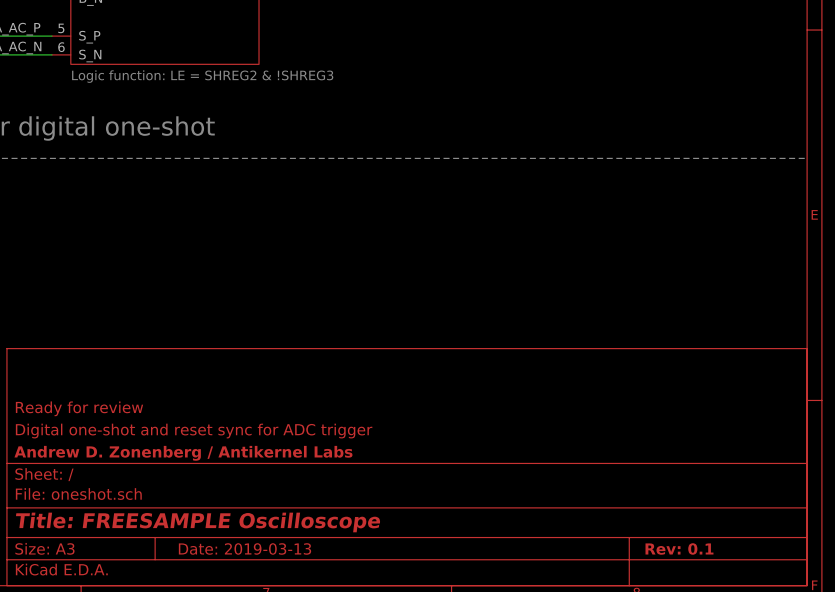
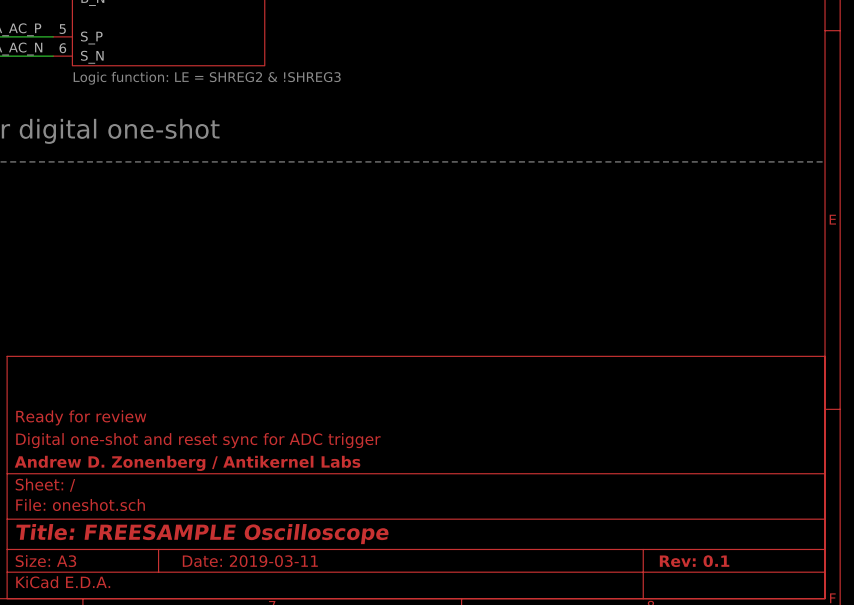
title block: Date: 2019-03-13 (244, 548) -> Date: 2019-03-11 (250, 561)

